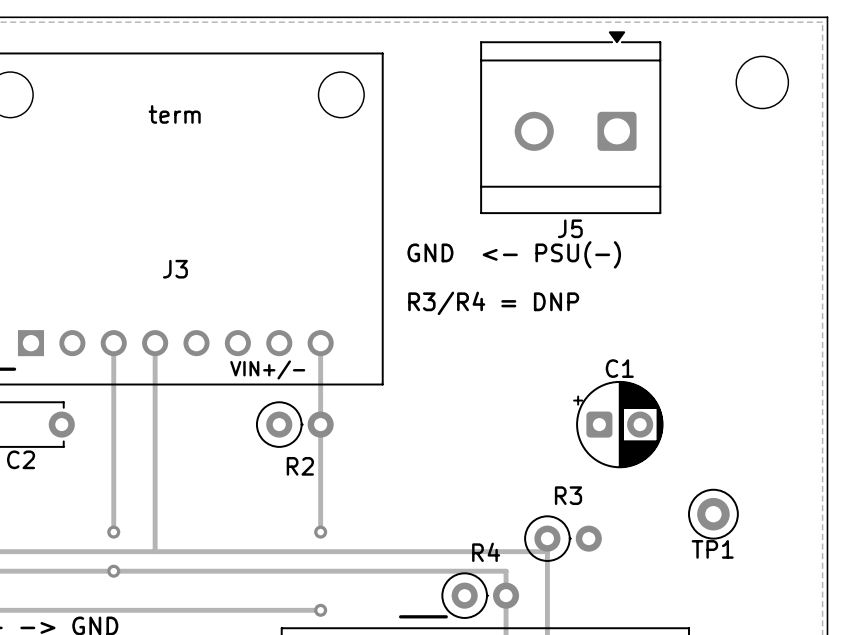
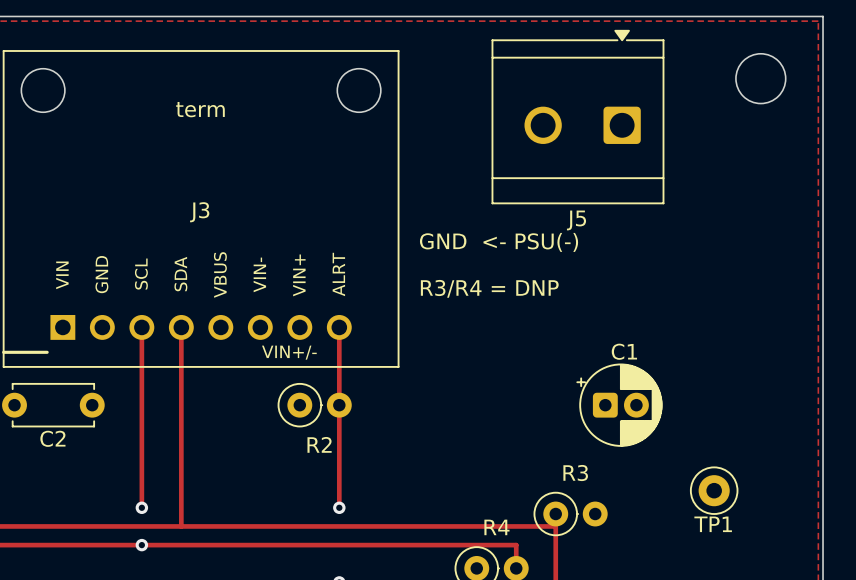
J3 name position: J3 (175, 269) -> J3 (199, 212)
J3 text: none -> GND (101, 274)
J3 text: none -> SCL (141, 274)
J3 text: none -> SDA (180, 274)
J3 text: none -> ALRT (338, 274)
J3 text: none -> VIN (62, 275)
J3 text: none -> VBUS (220, 274)
J3 text: none -> VIN- (259, 274)
J3 text: none -> VIN+ (299, 275)
C1 footprint: [573, 380, 664, 469] -> [576, 363, 663, 447]

